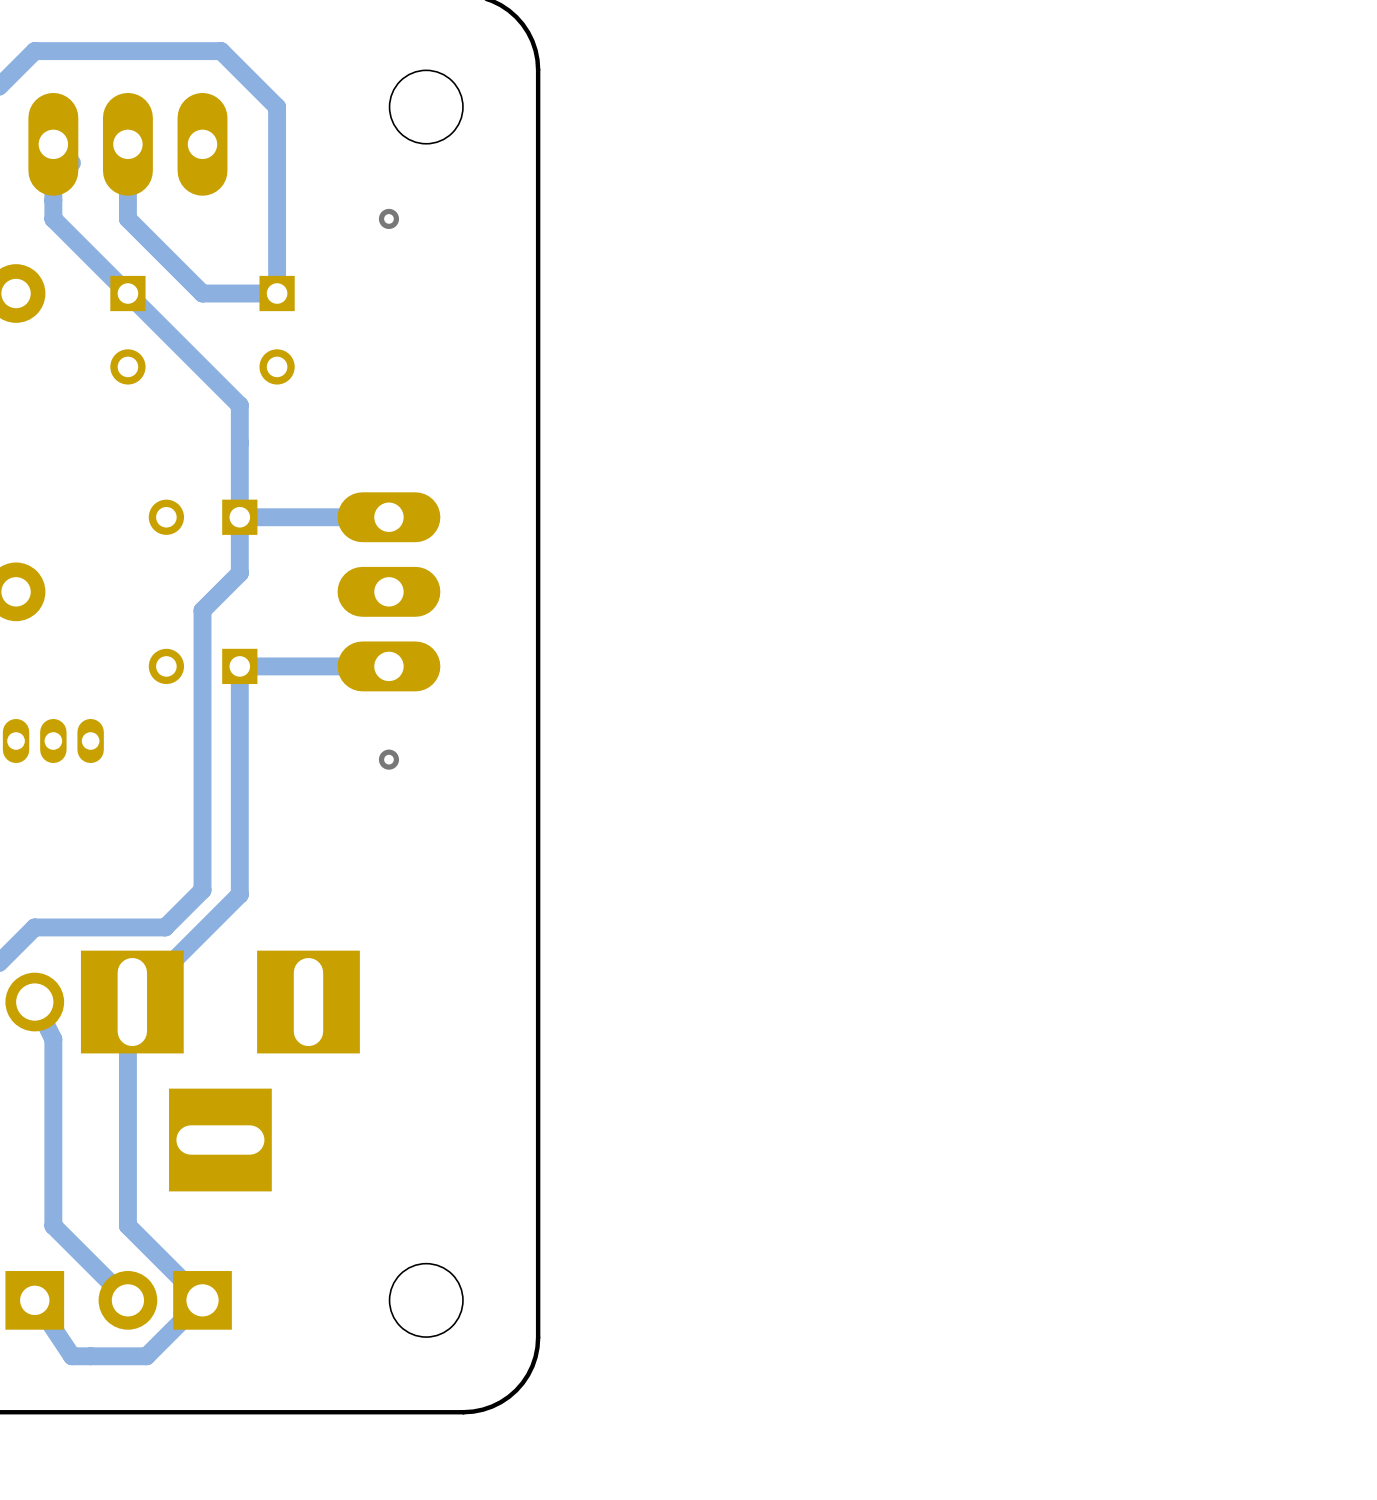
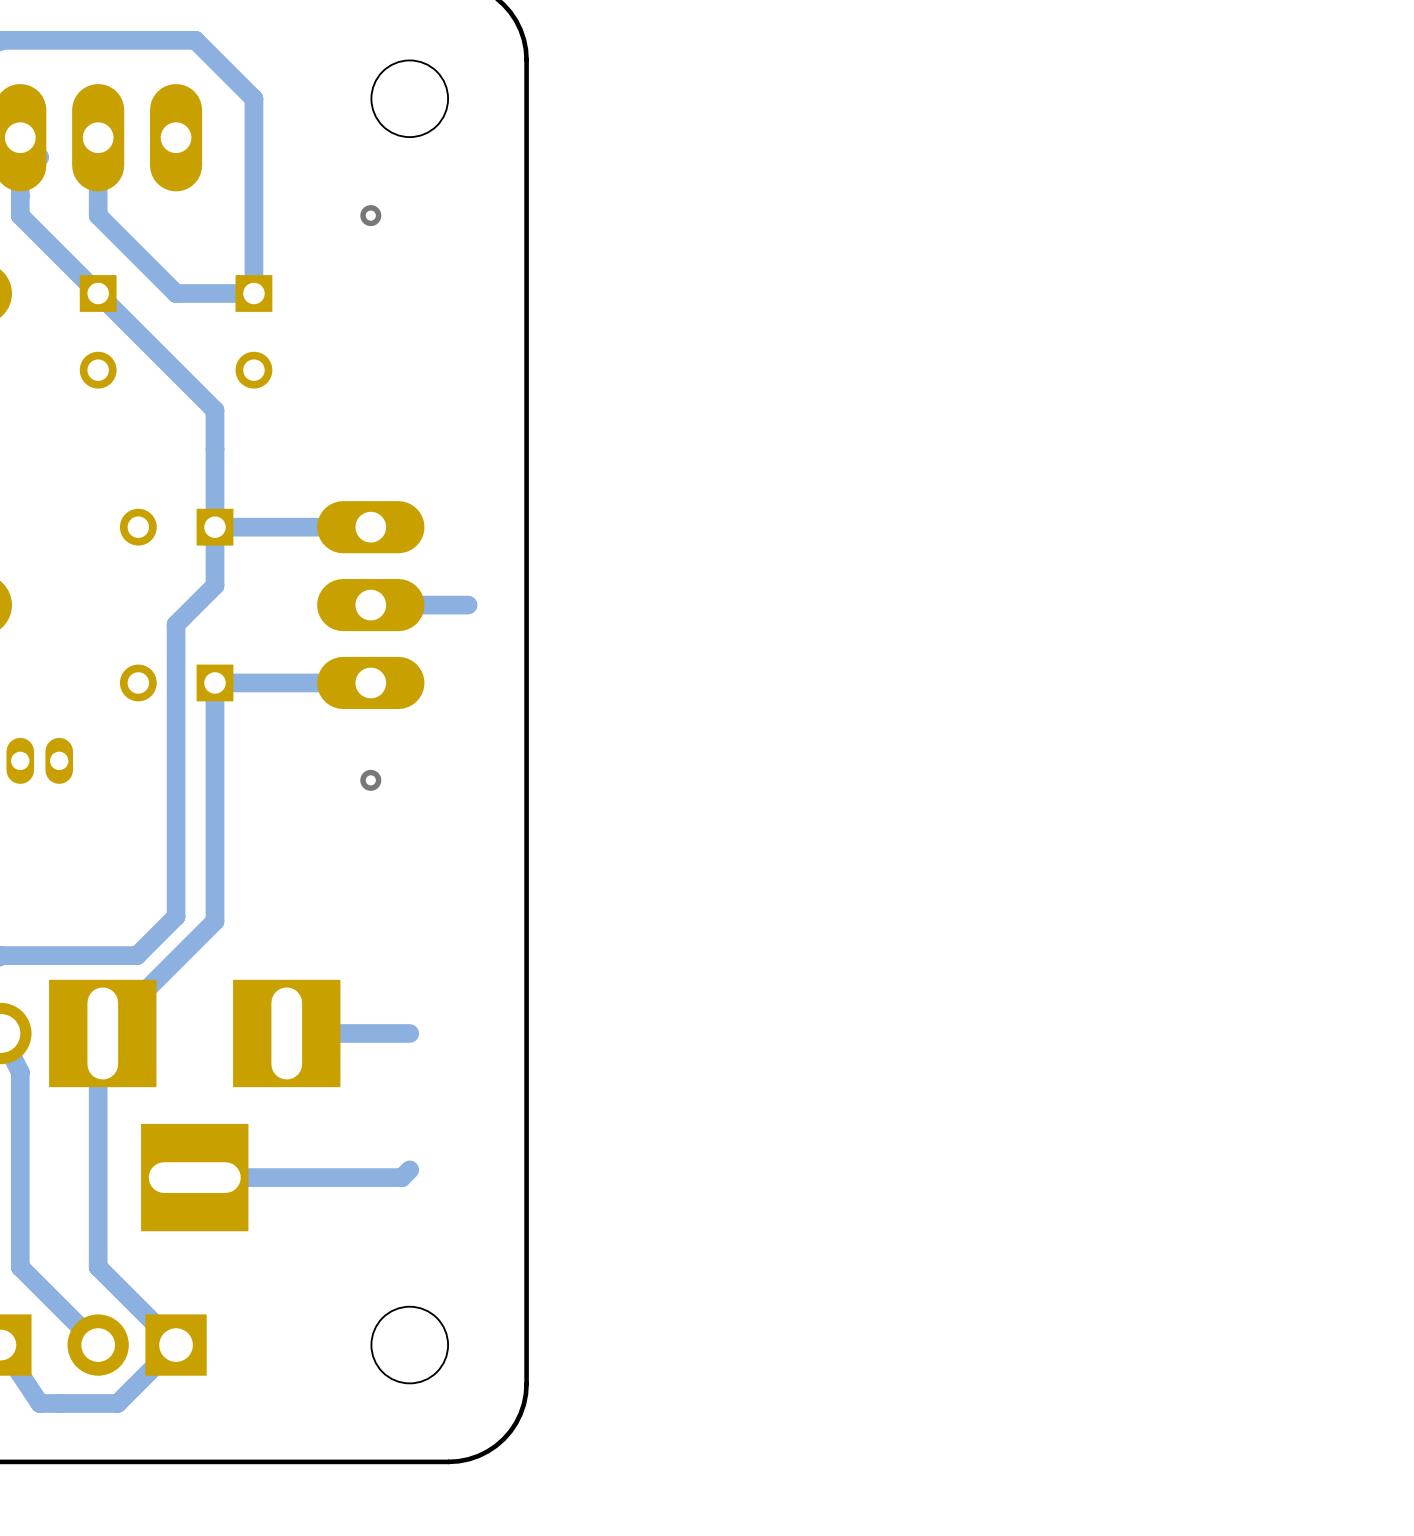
track: none -> (468, 605) (370, 605)
track: none -> (409, 1033) (286, 1033)
track: none -> (409, 1169) (401, 1177) (194, 1177)

